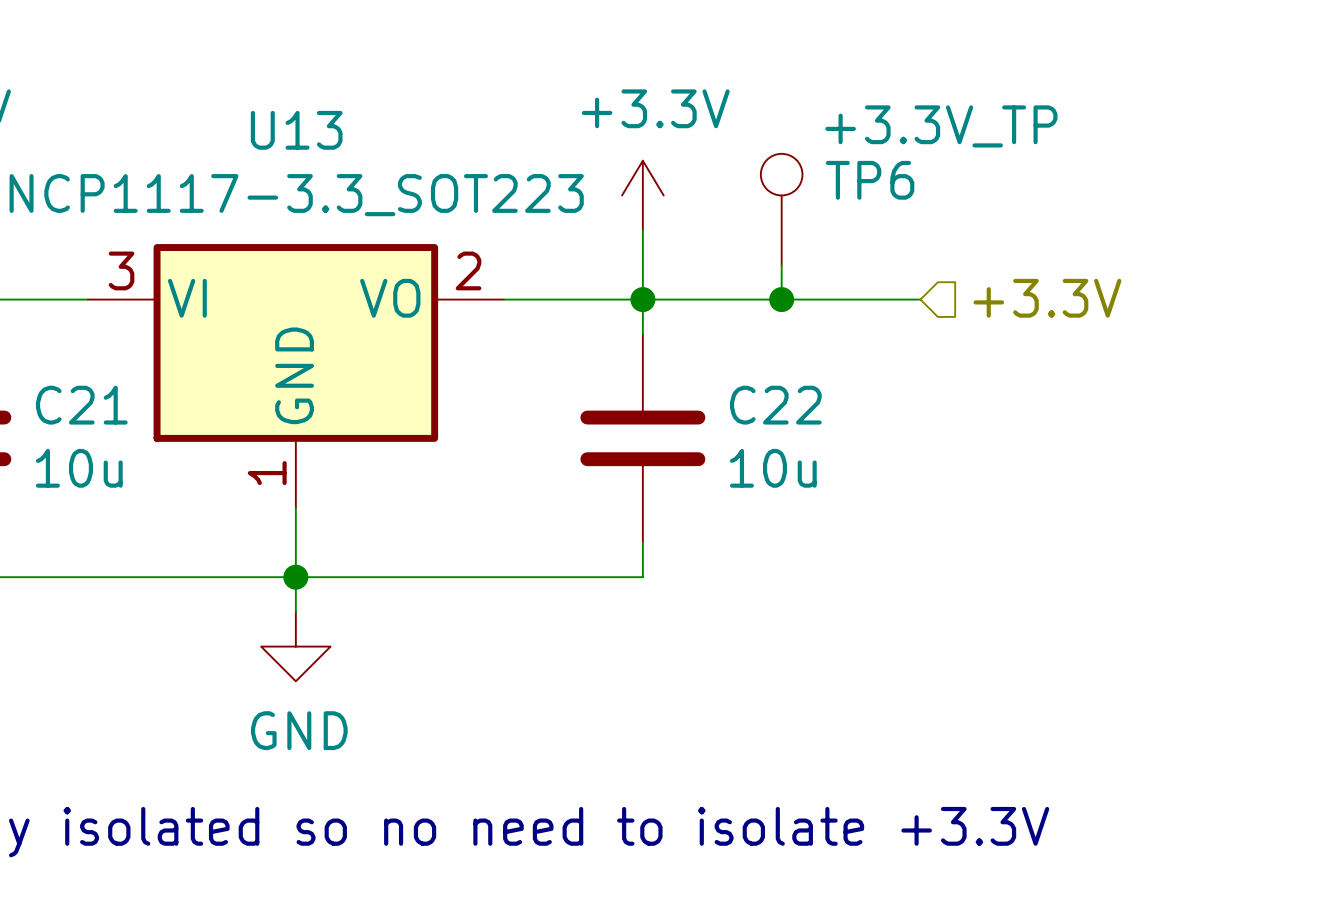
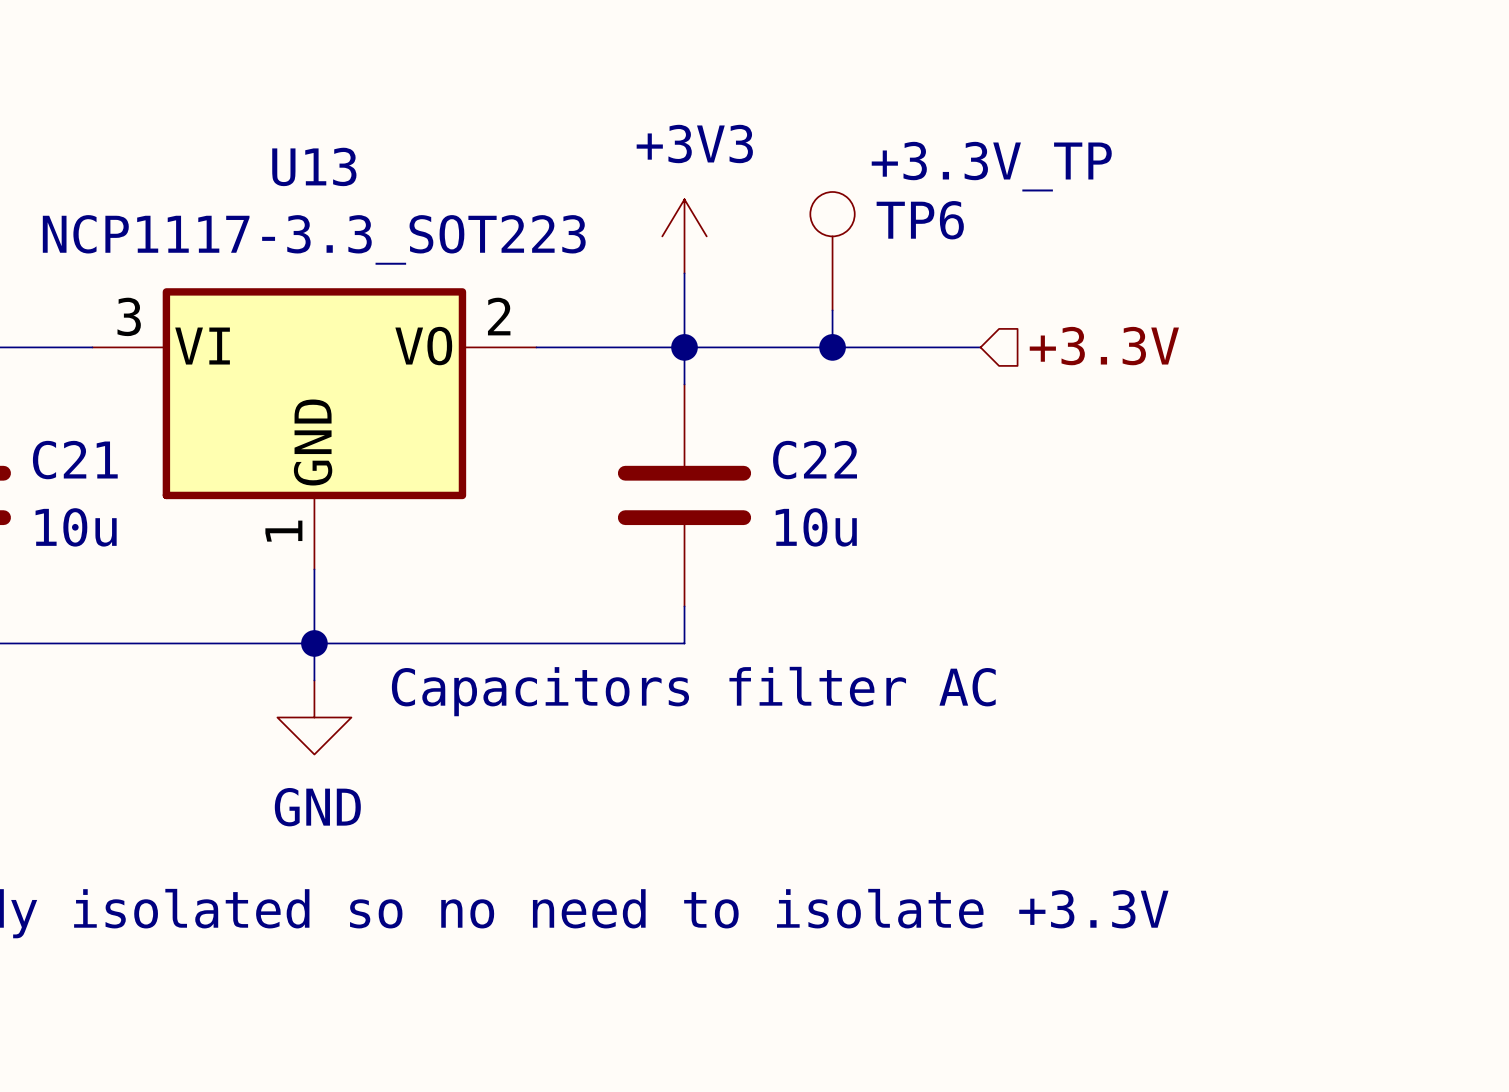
power symbol: +3.3V (642, 195) -> +3V3 (684, 236)
text: none -> Capacitors filter AC (693, 691)

